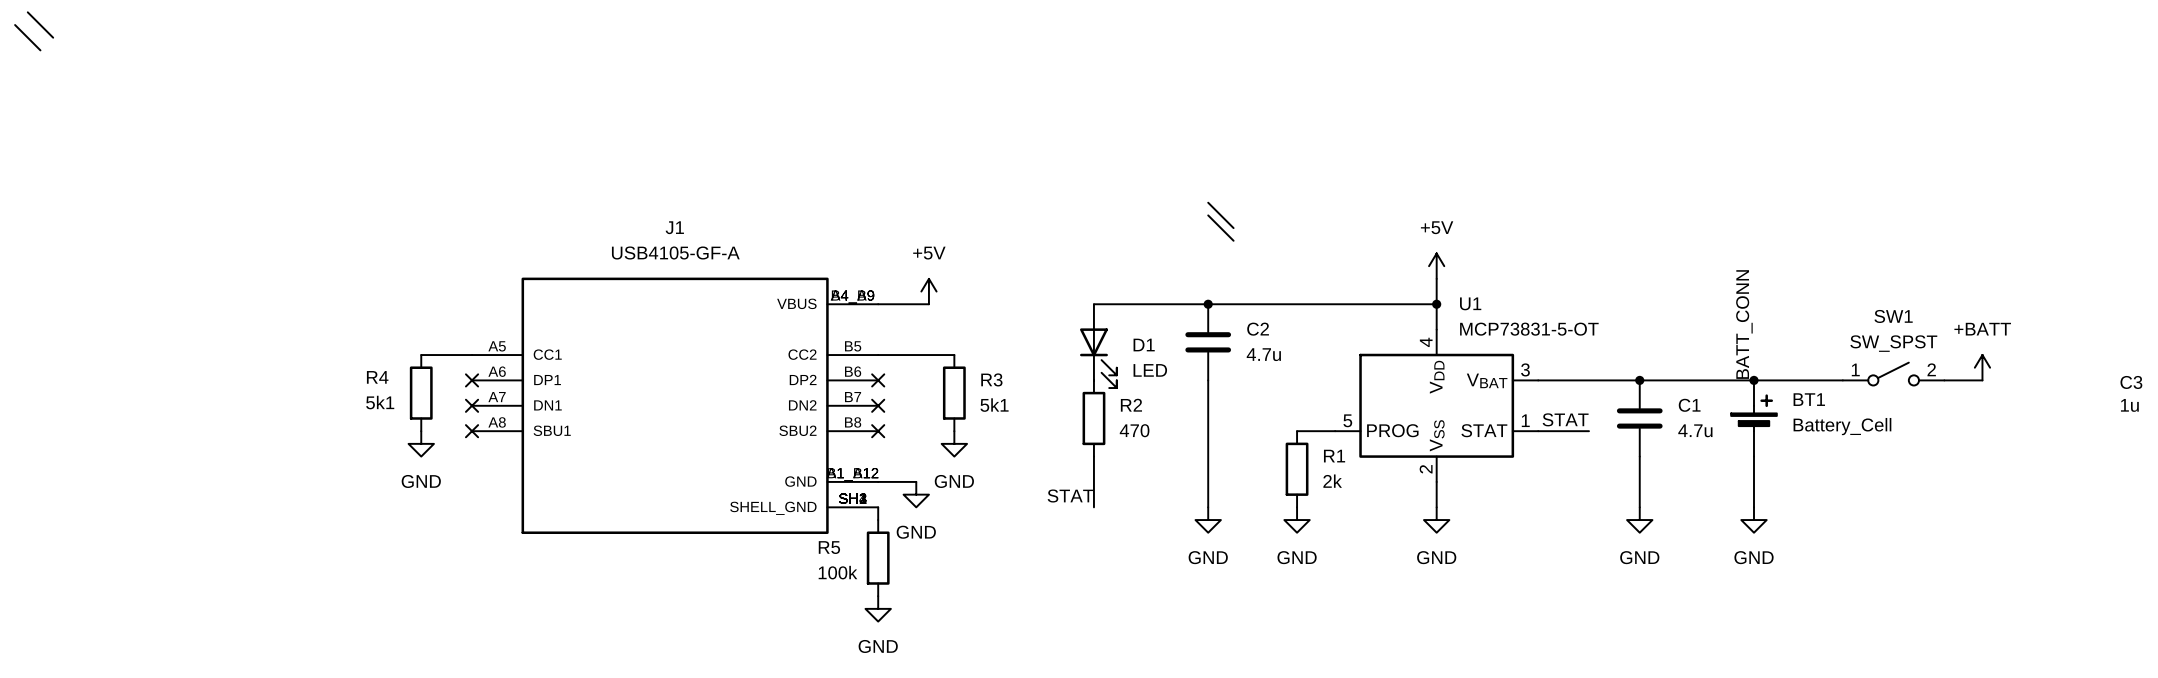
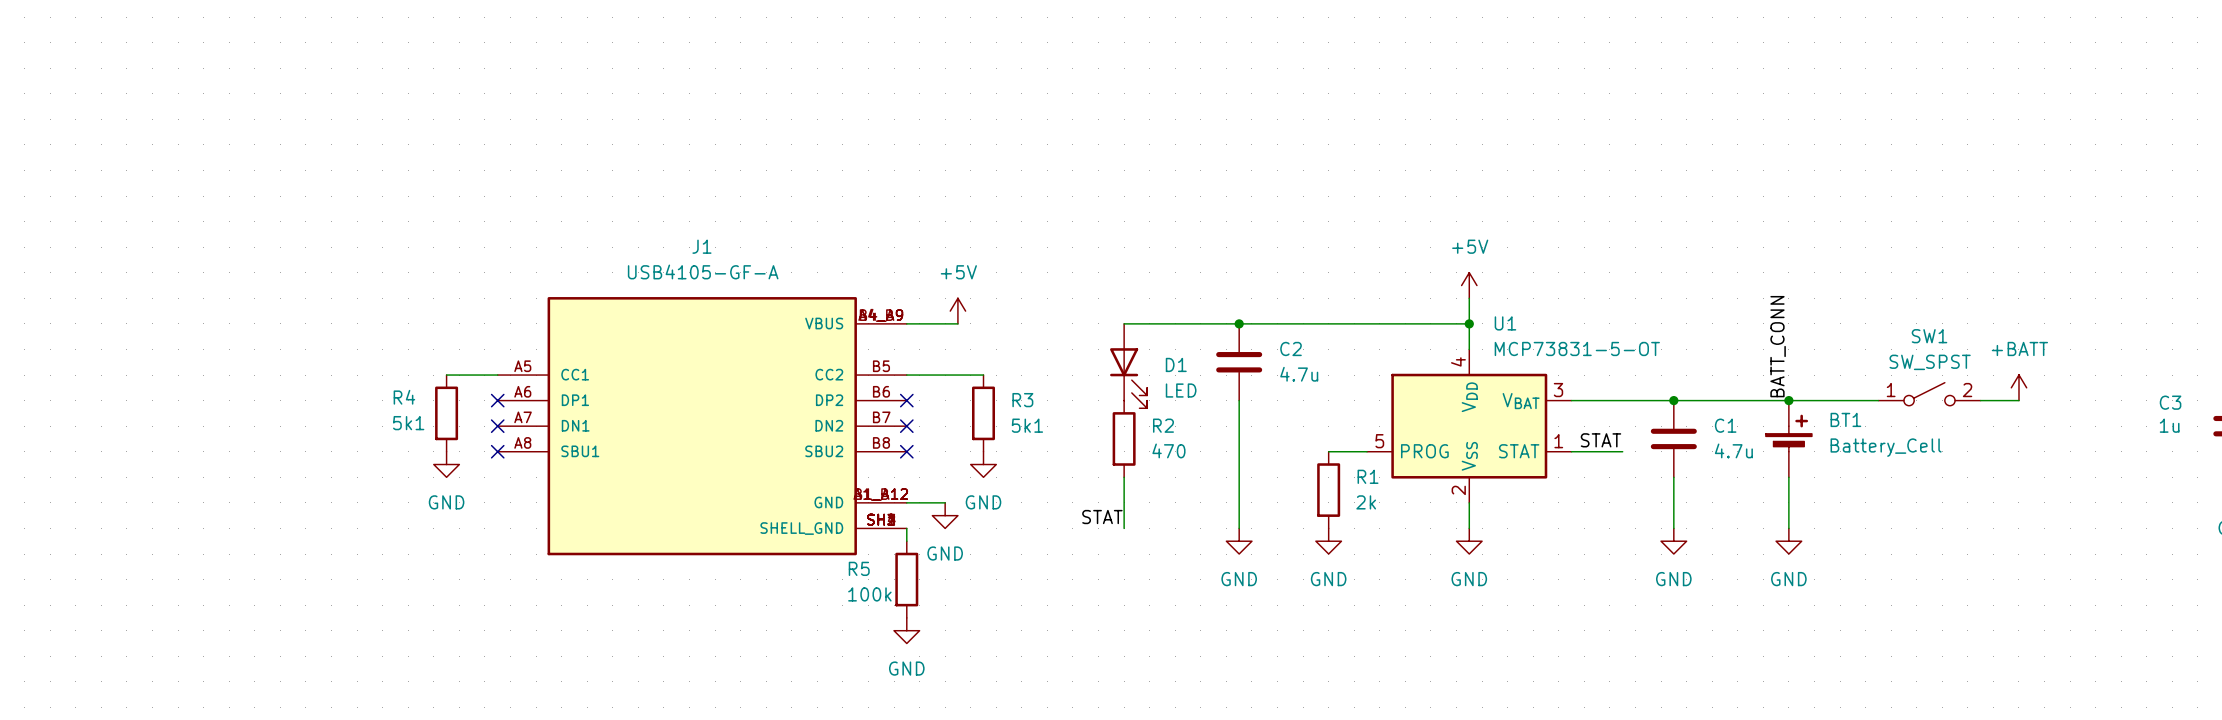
wire: (27, 12) (53, 37) -> none
wire: (15, 25) (40, 50) -> none
wire: (1208, 202) (1233, 228) -> none
wire: (1208, 215) (1233, 240) -> none

